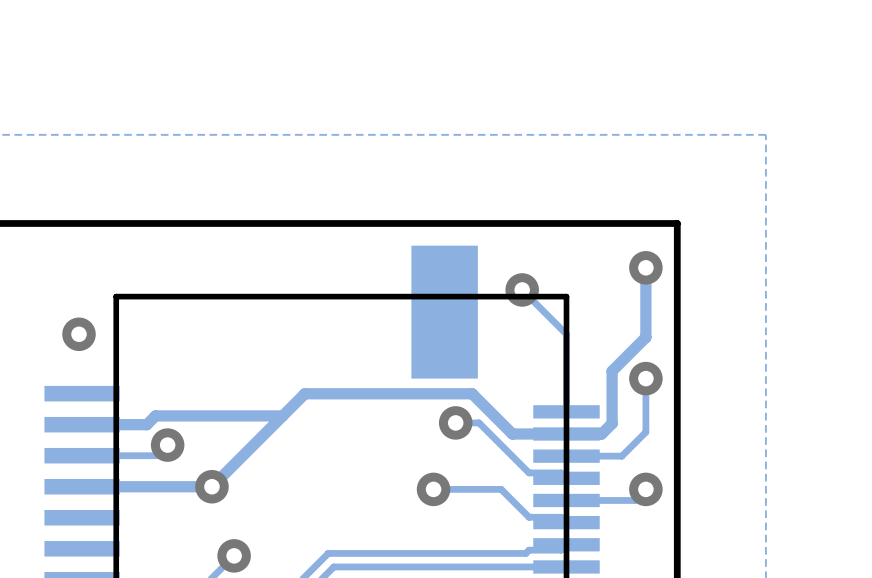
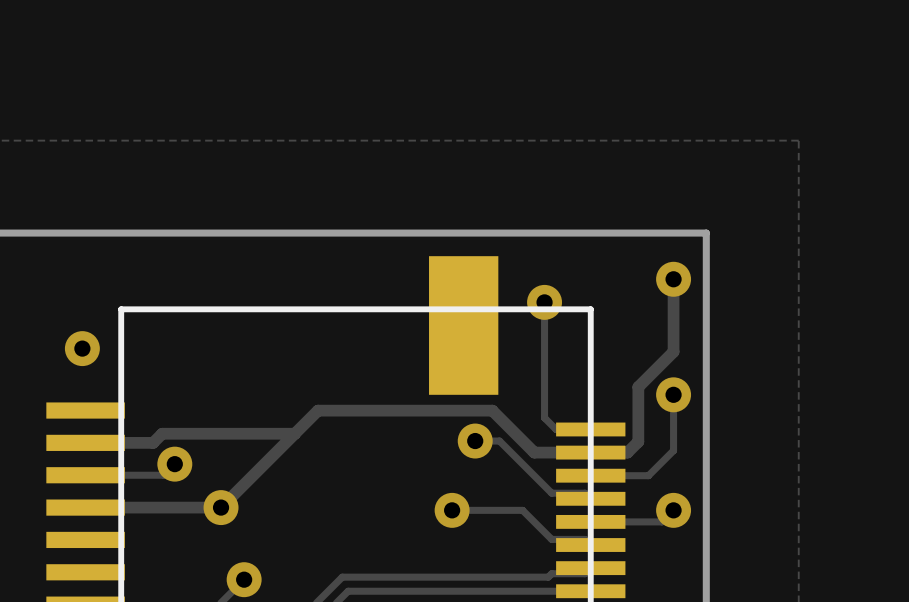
track: (522, 289) (566, 334) (566, 411) -> (544, 302) (544, 417) (556, 429) (590, 429)

